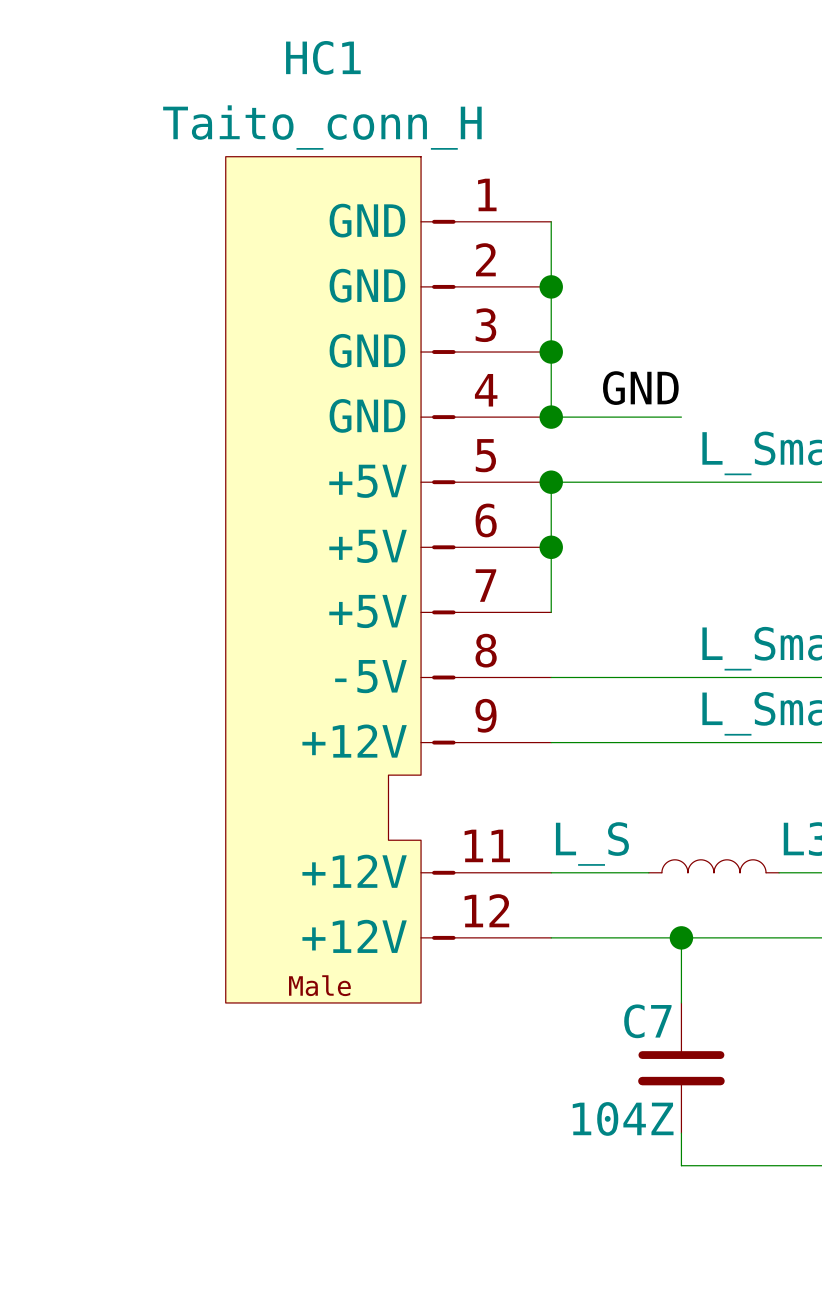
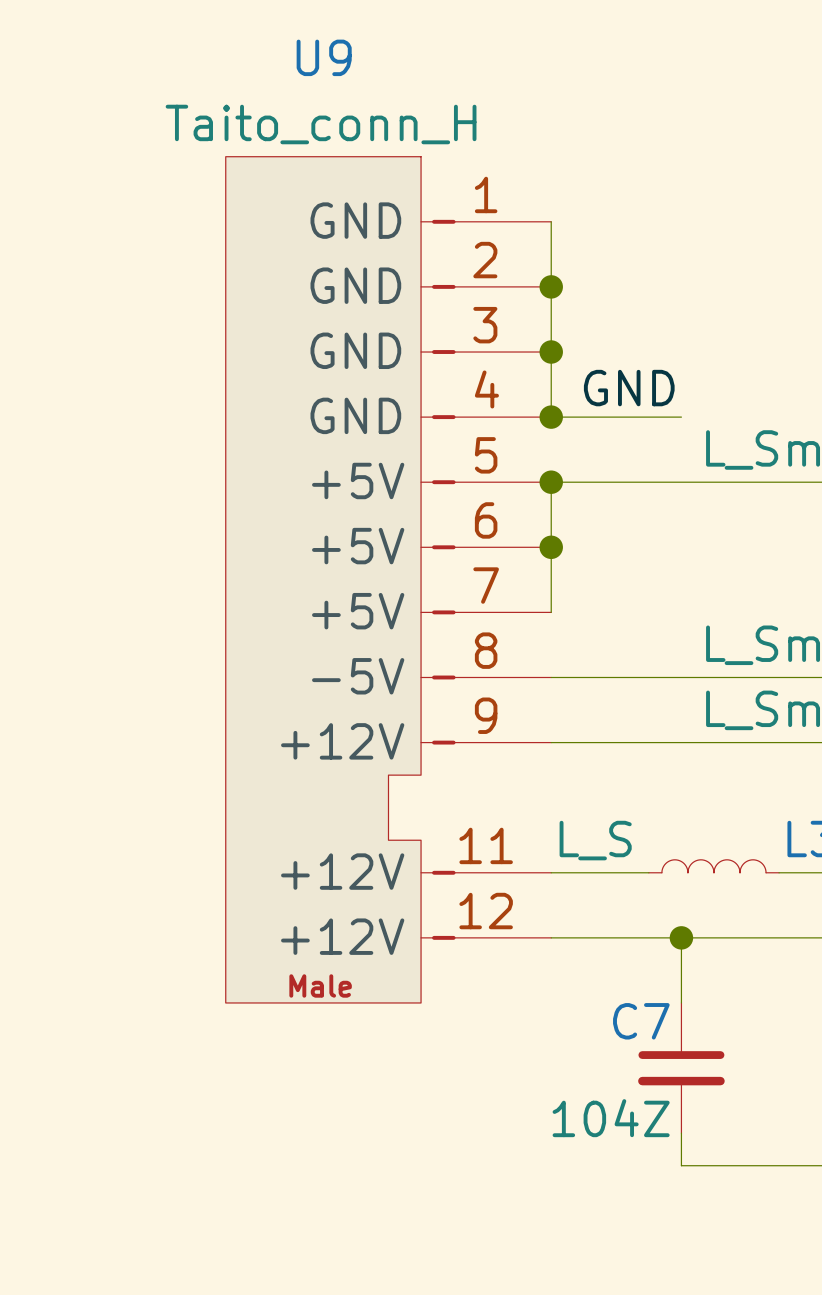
HC1 name: HC1 (323, 57) -> U9 (324, 57)

